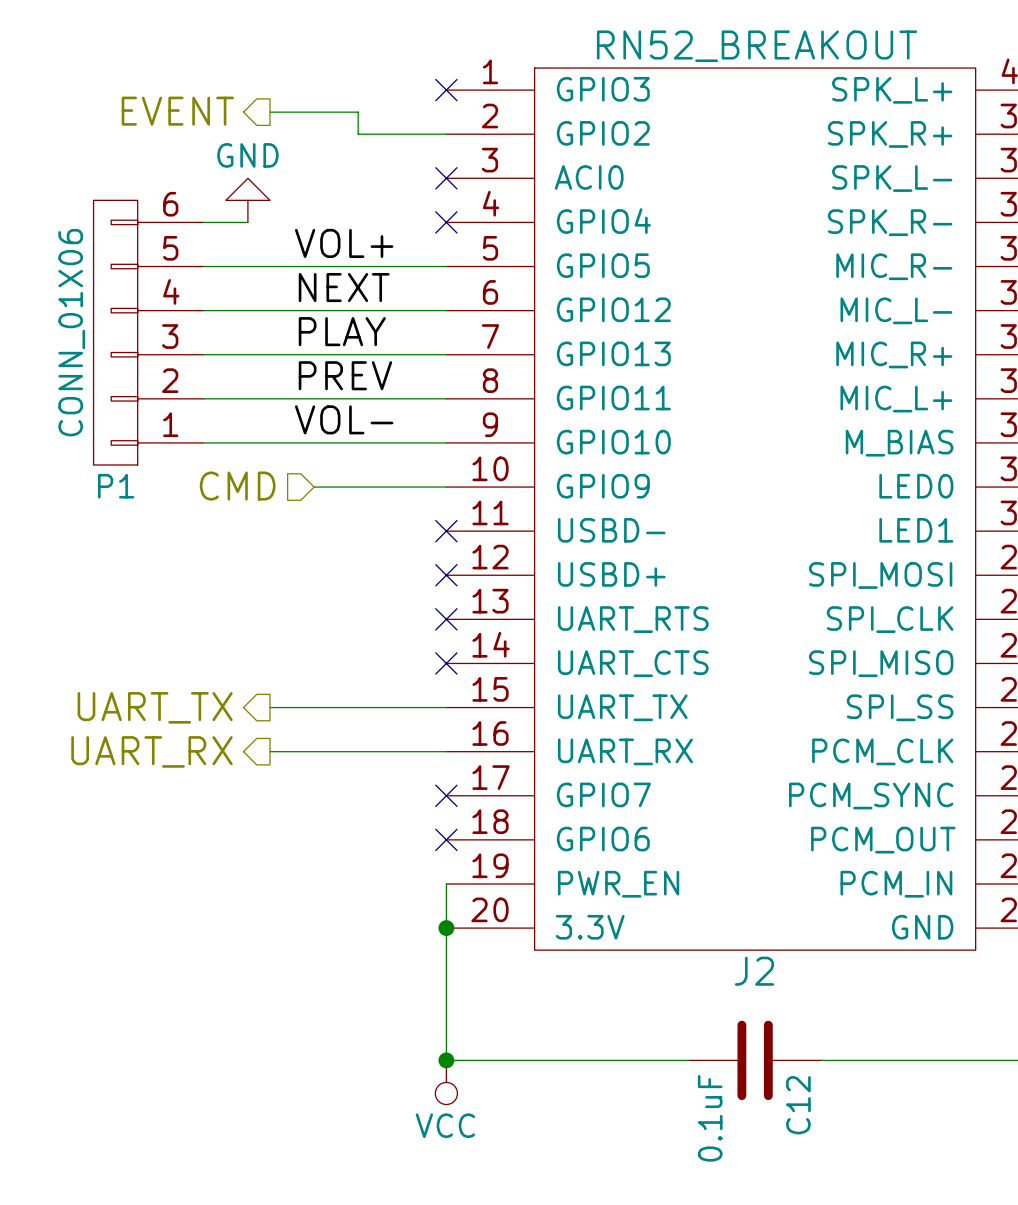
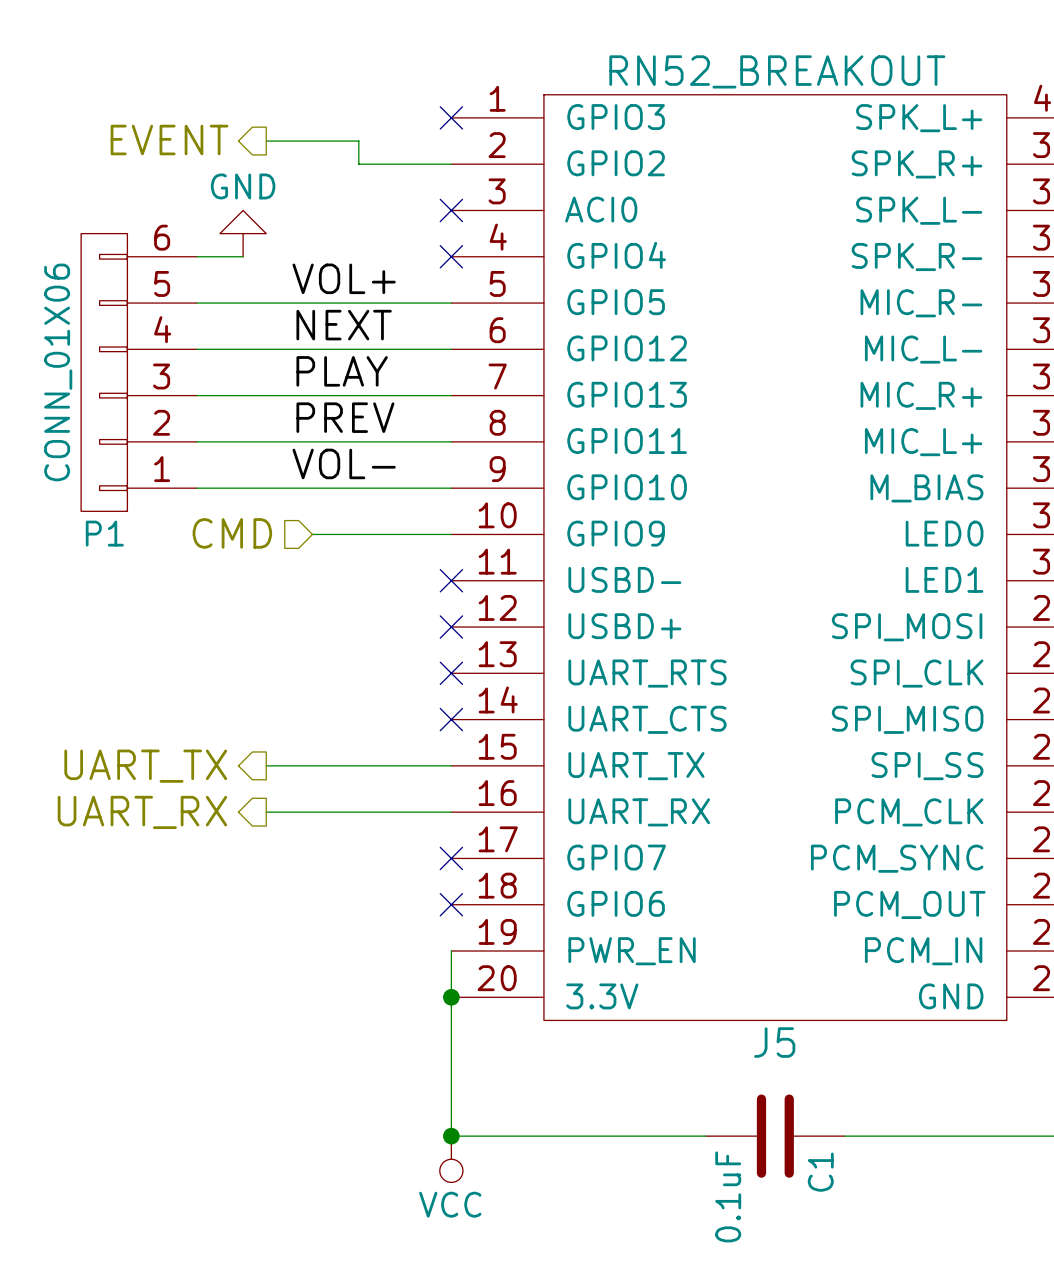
J2 name: J2 (754, 971) -> J5 (774, 1042)
C12 name: C12 (798, 1105) -> C1 (820, 1172)

